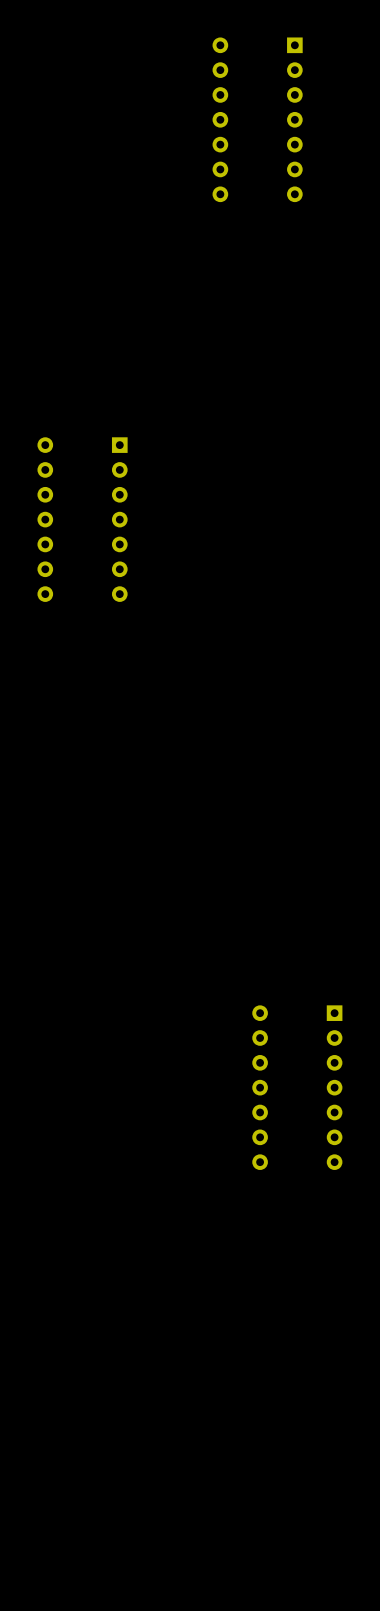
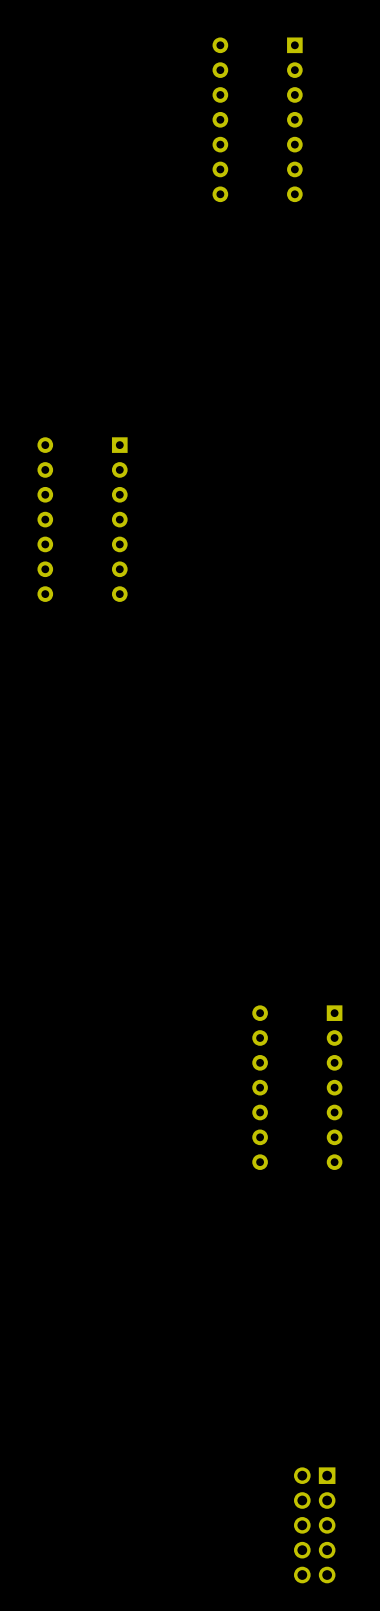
part: none -> (314, 1525)

